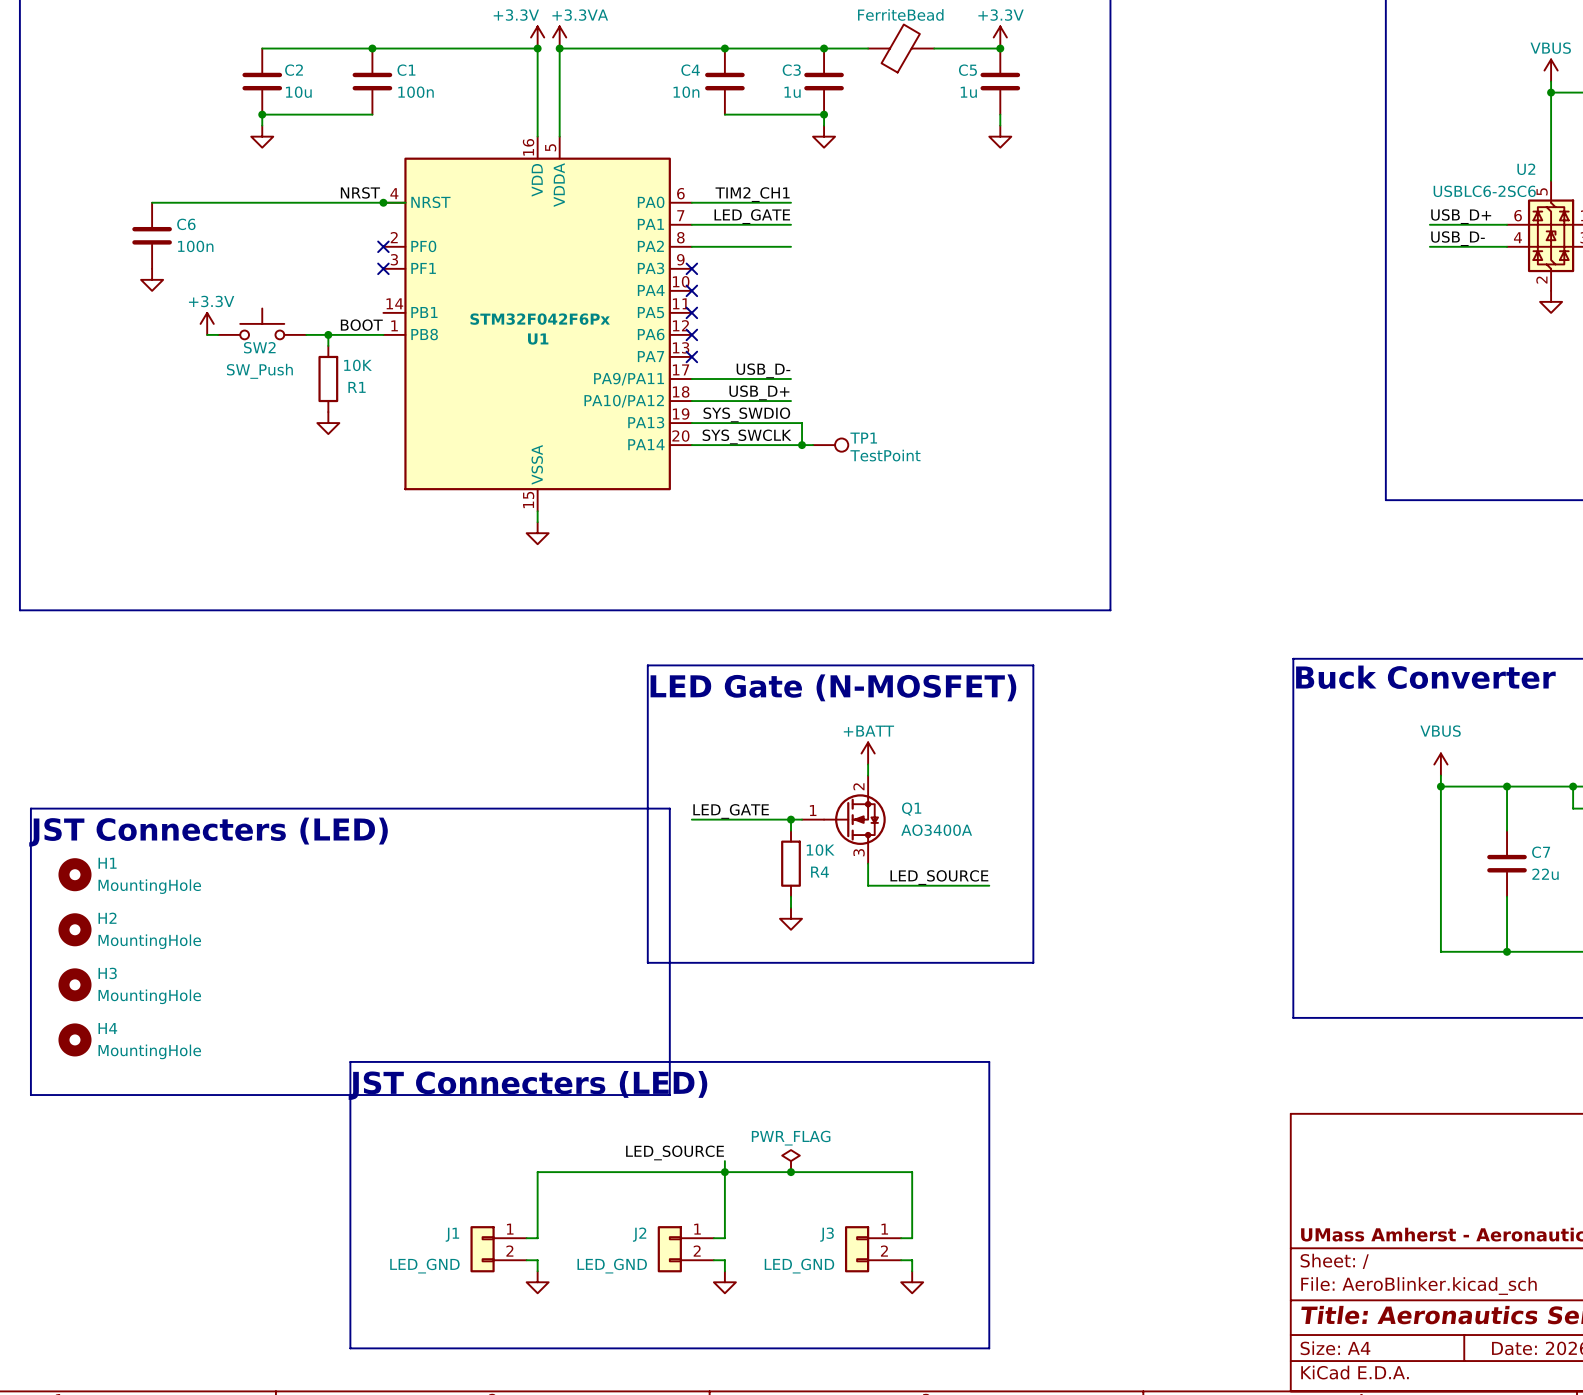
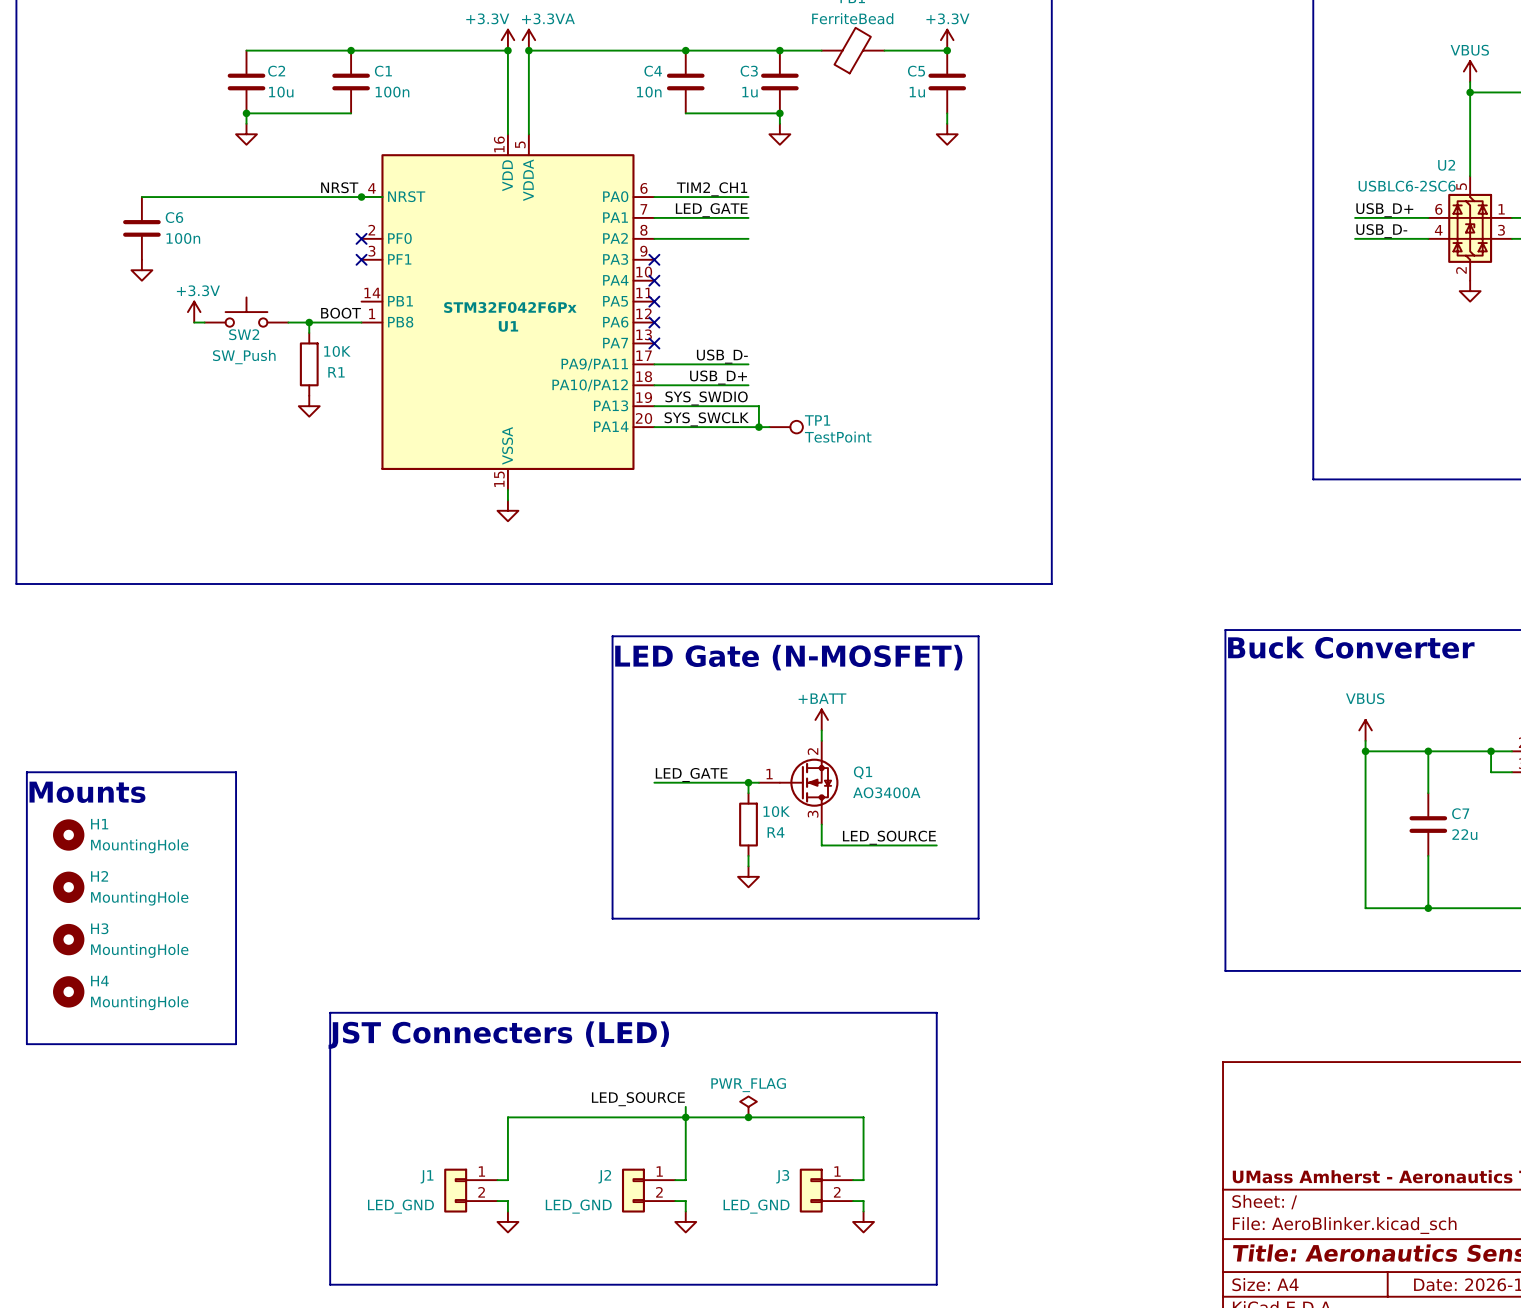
line: (251, 808) (669, 808) (669, 1095) (251, 1095) -> (236, 772) (236, 1044)
text: JST Connecters (LED) (208, 832) -> Mounts (87, 792)

